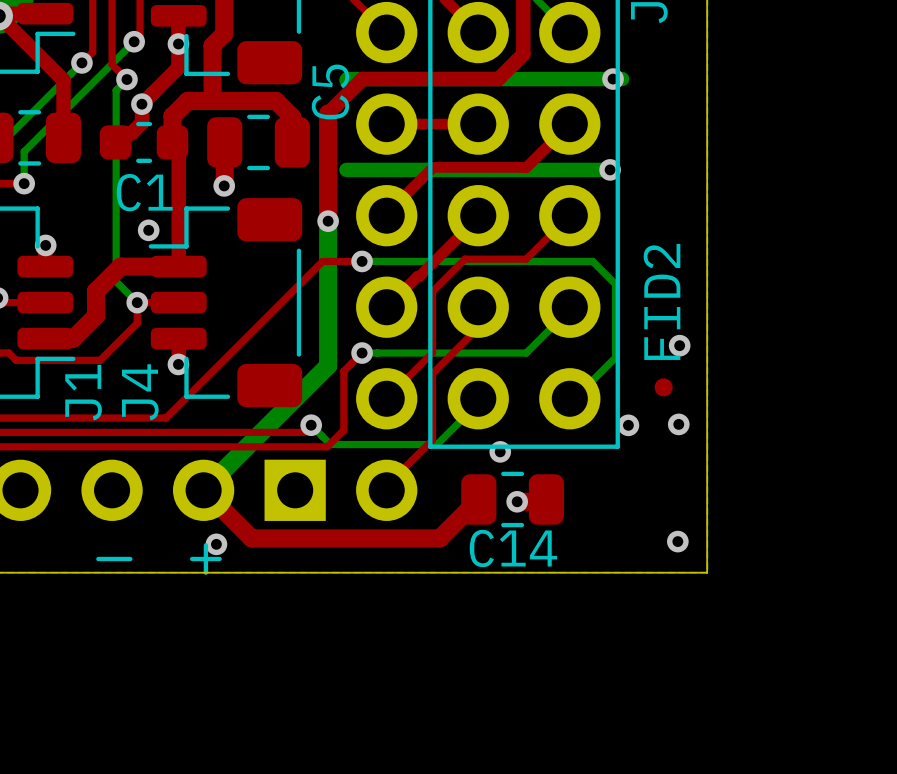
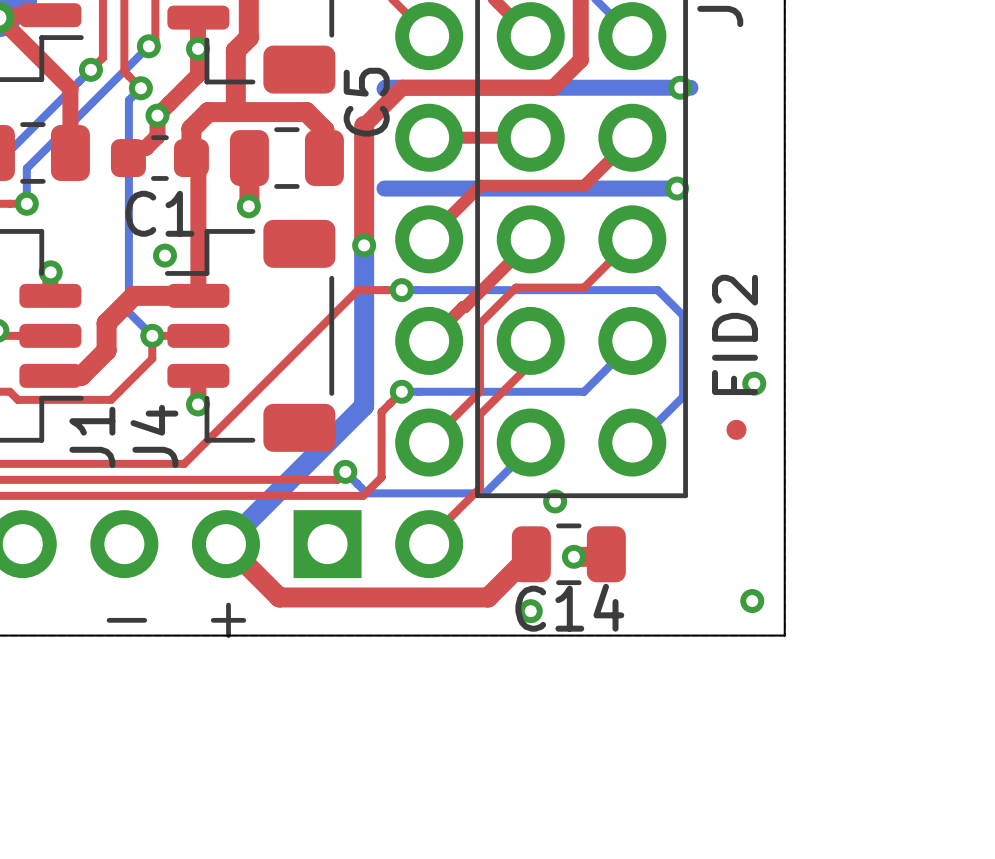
via: (678, 424) -> none
via: (628, 425) -> none
via: (216, 544) -> none
via: none -> (530, 611)

